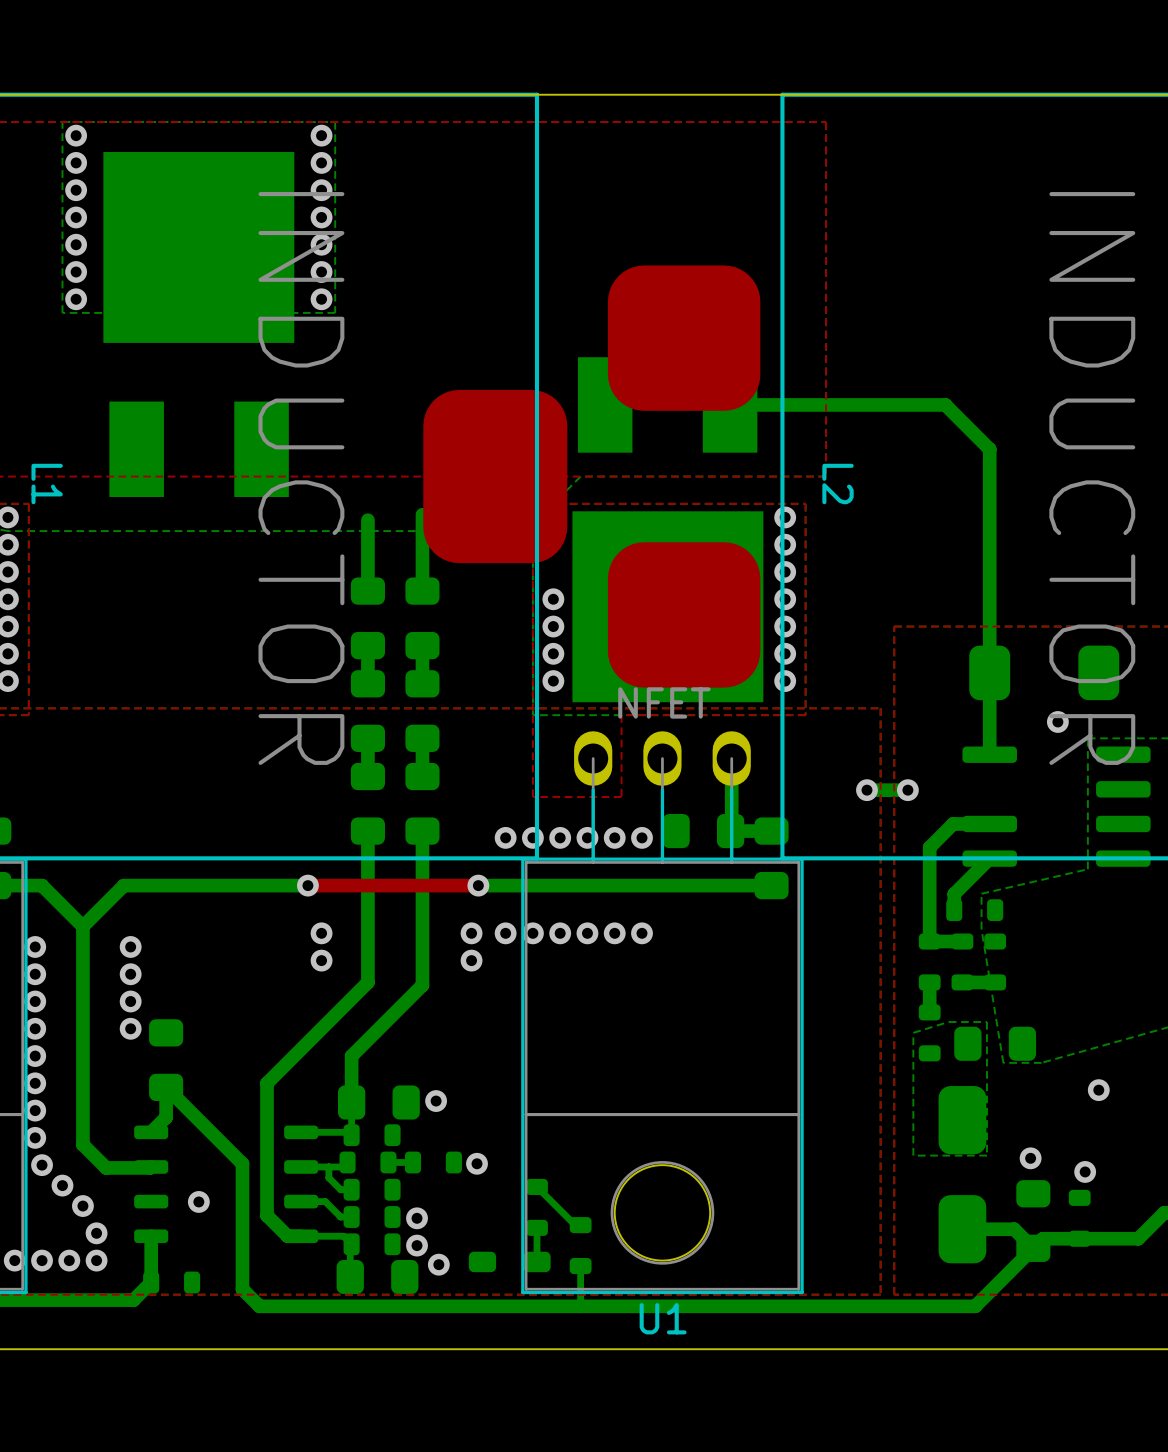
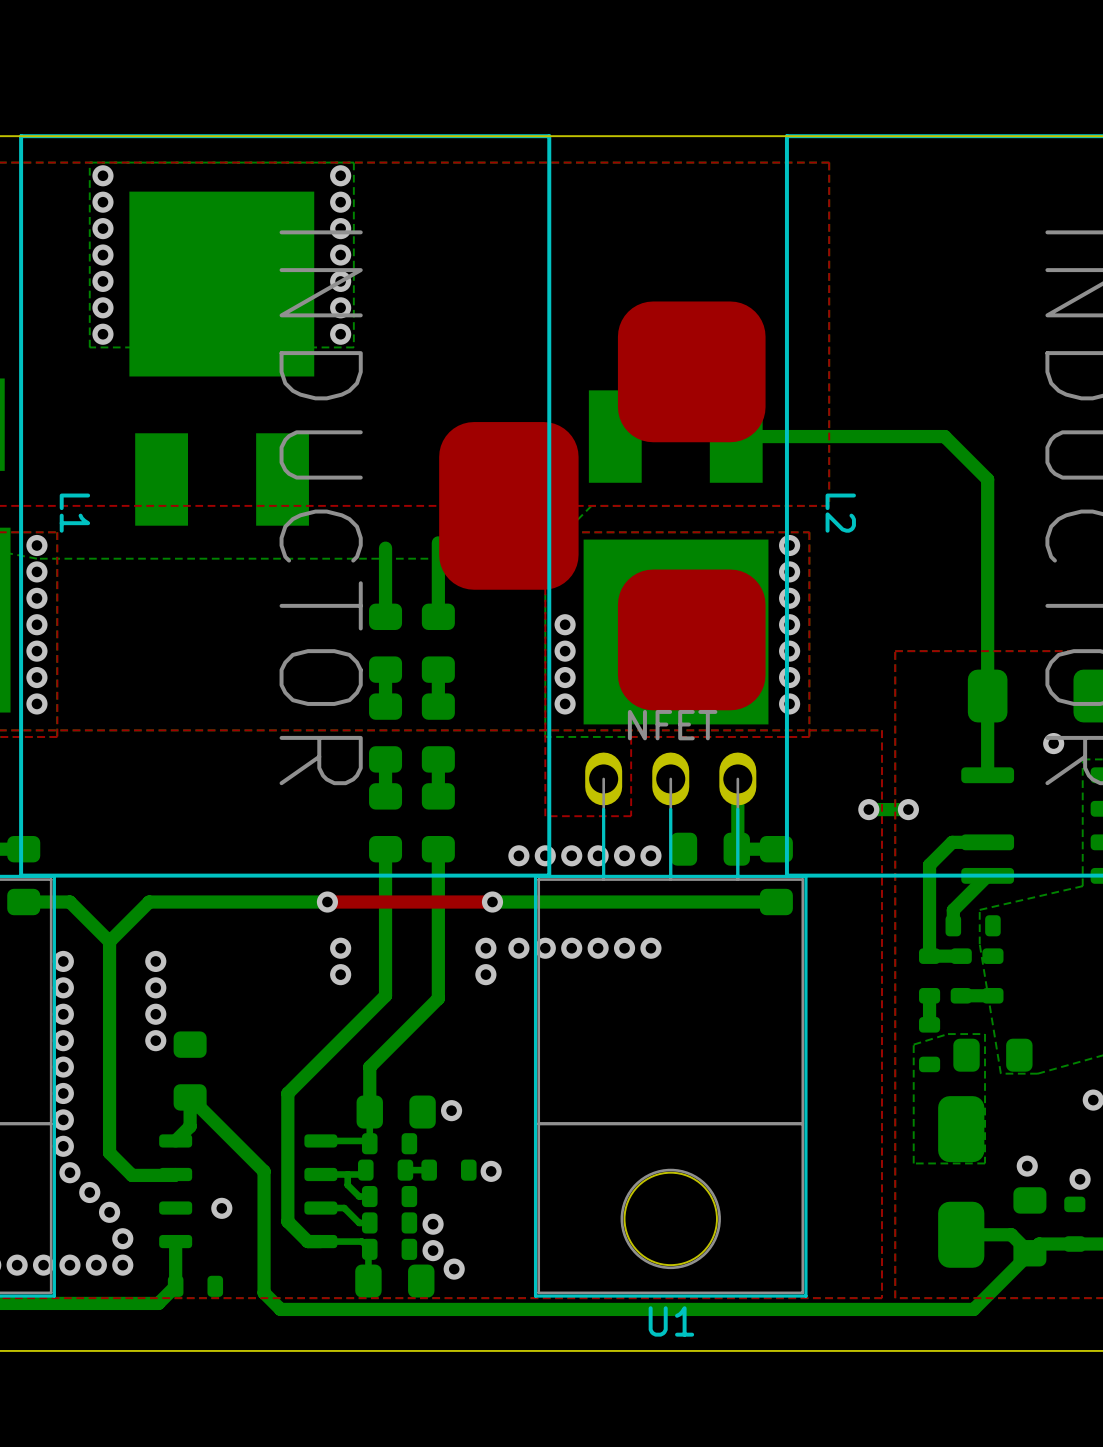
bottom track: (537, 1186) (575, 1225) (580, 1225) -> none
part: (537, 1207) -> none
bottom track: (537, 1227) (537, 1261) -> none
part: (580, 1245) -> none
part: (509, 1261) -> none
bottom track: (580, 1266) (579, 1306) -> none

